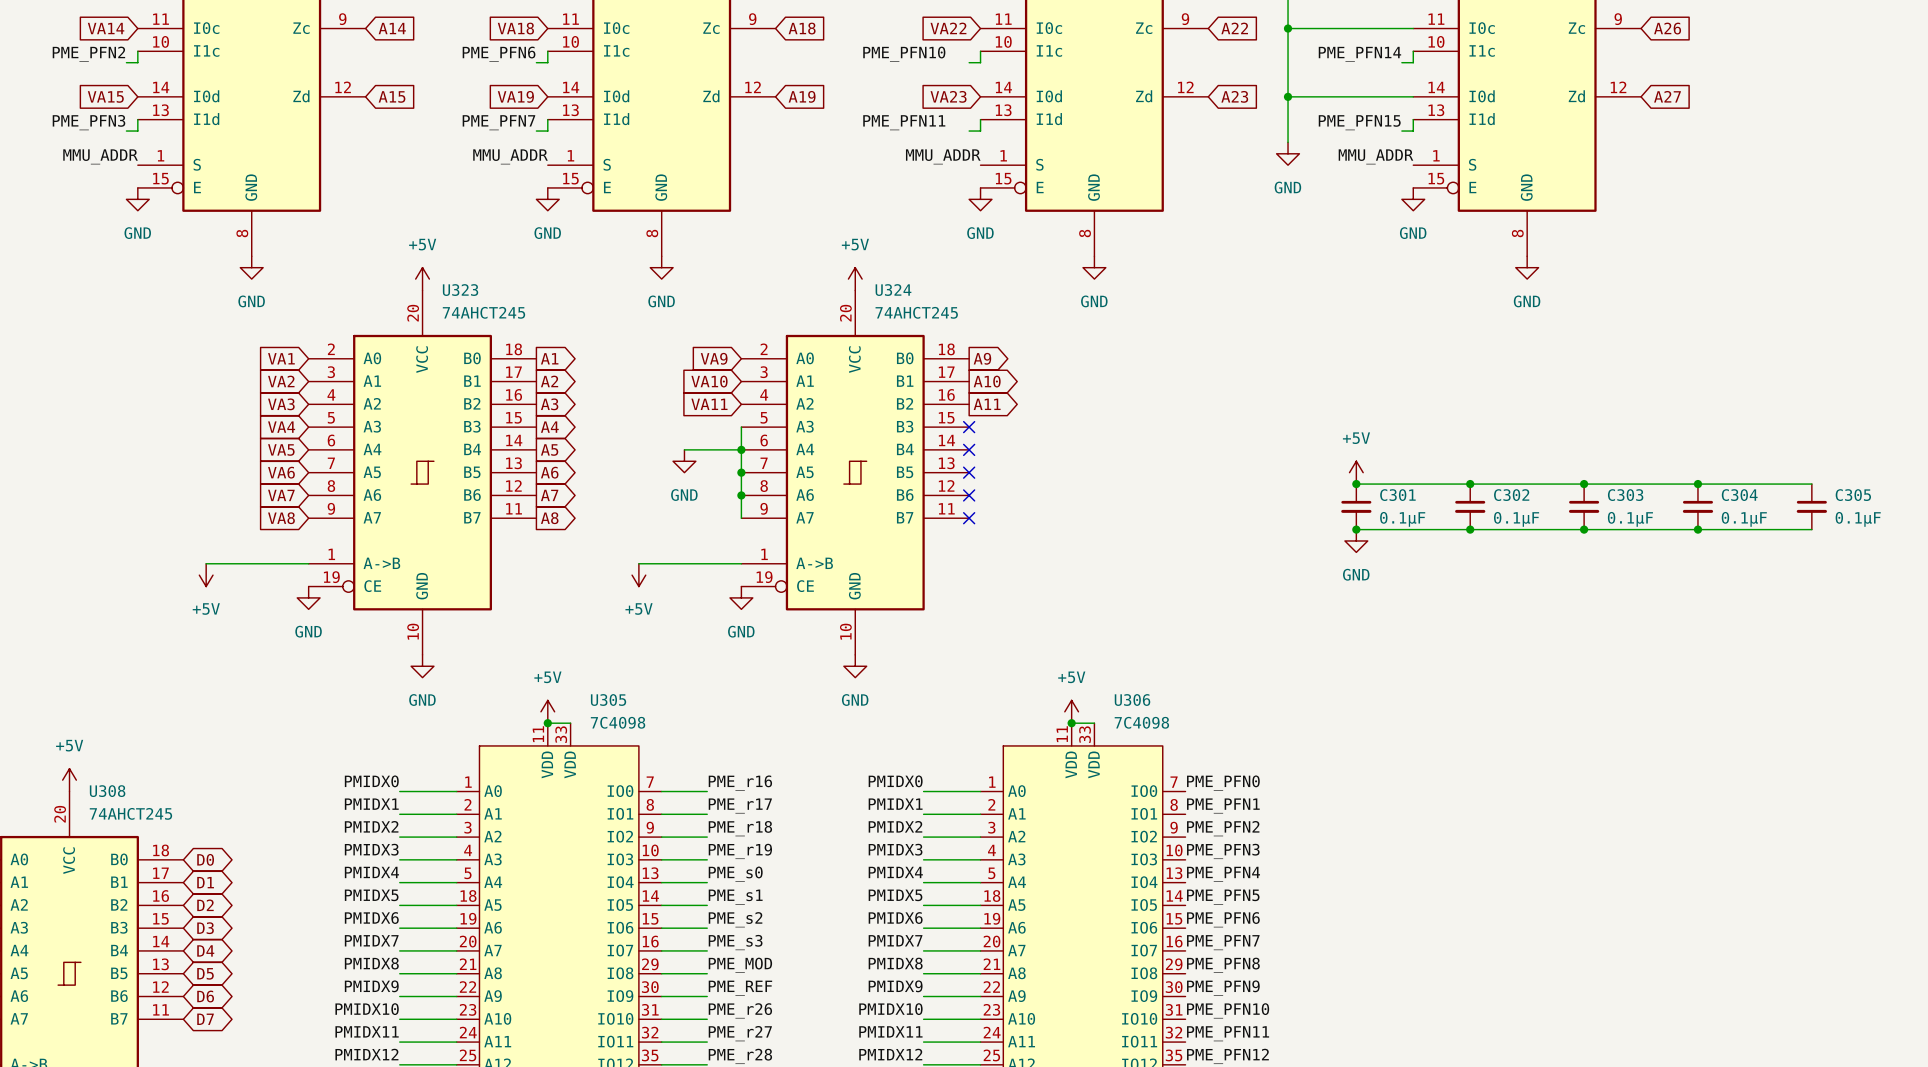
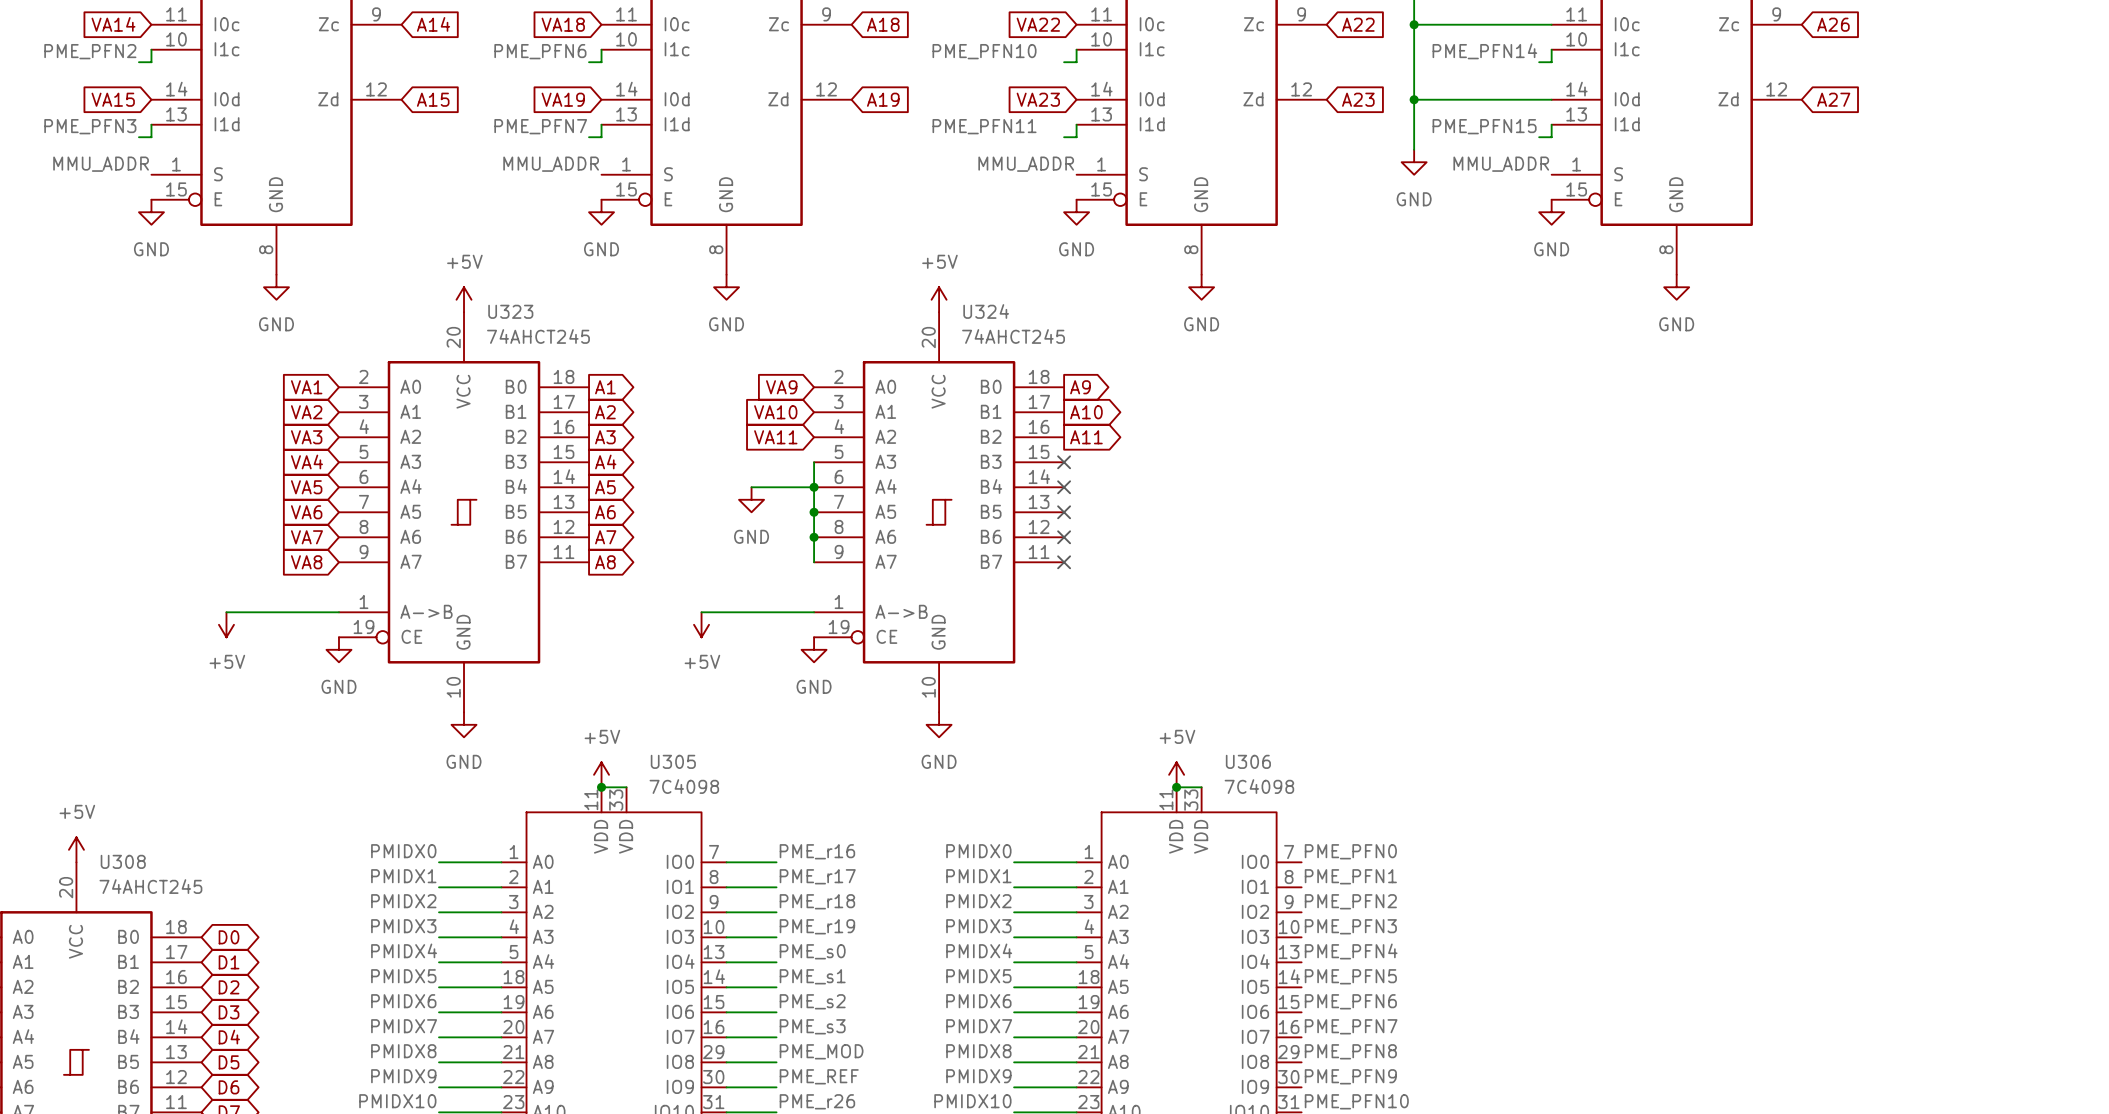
power symbol: +5V (1356, 472) -> none
wire: (1356, 484) (1811, 484) -> none
junction: (1356, 484) -> none
junction: (1470, 484) -> none
junction: (1584, 484) -> none
junction: (1697, 484) -> none
C301: 0.1µF (1356, 506) -> none
C302: 0.1µF (1470, 506) -> none
C303: 0.1µF (1584, 506) -> none
C304: 0.1µF (1697, 506) -> none
C305: 0.1µF (1811, 506) -> none
wire: (1356, 529) (1811, 529) -> none
junction: (1356, 529) -> none
junction: (1470, 529) -> none
junction: (1584, 529) -> none
junction: (1697, 529) -> none
power symbol: GND (1356, 540) -> none

